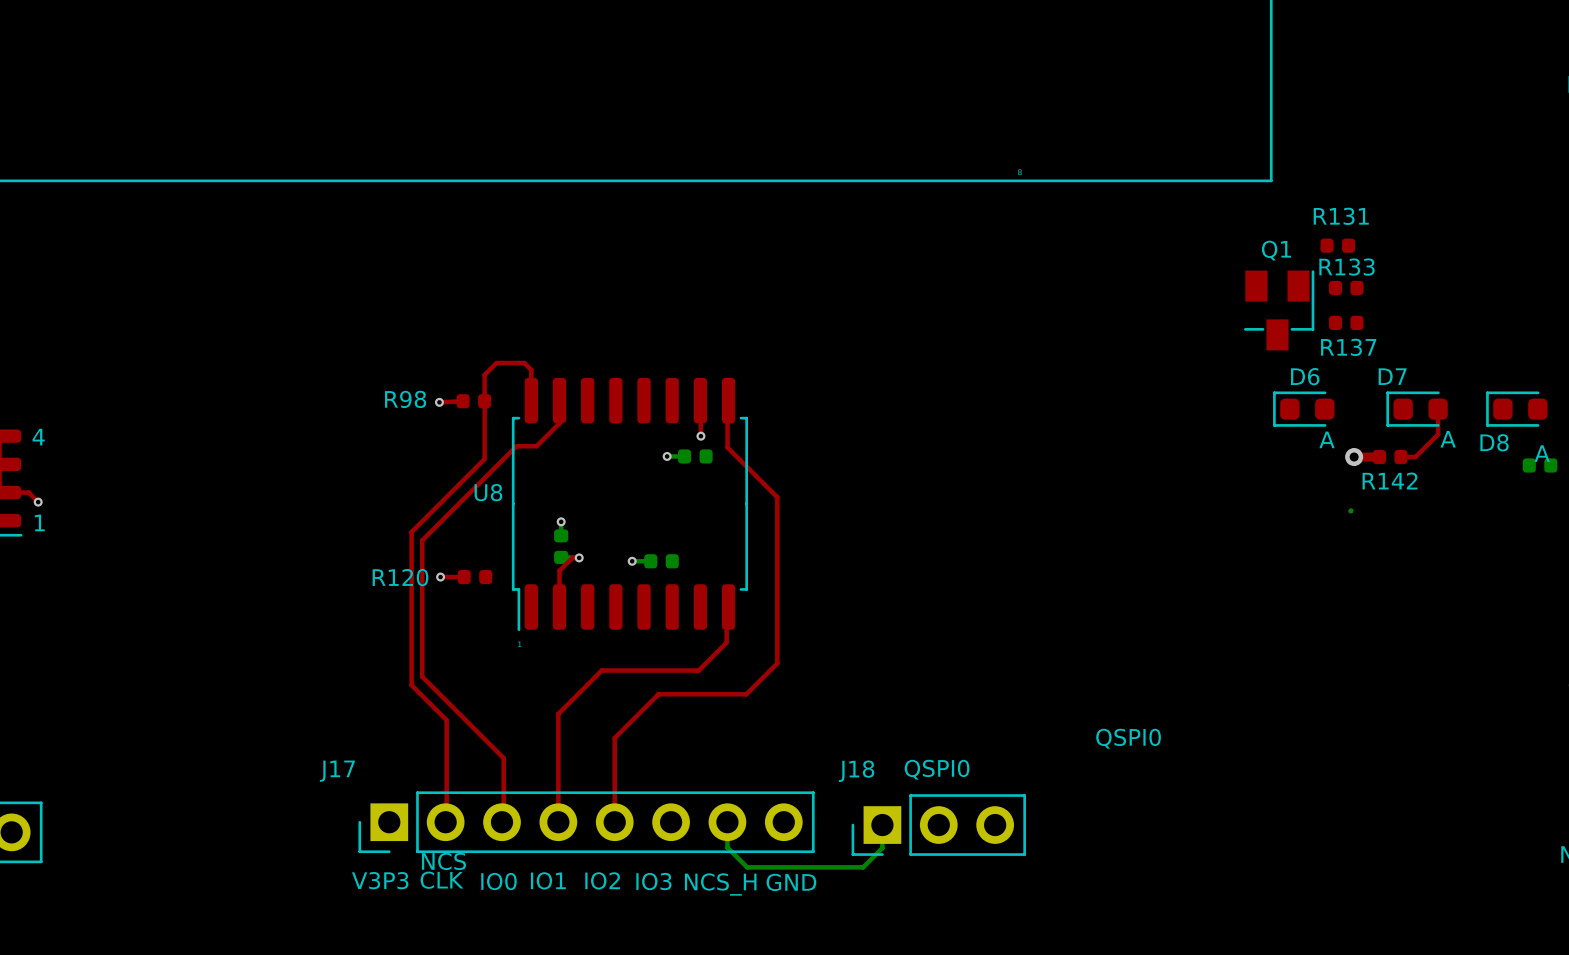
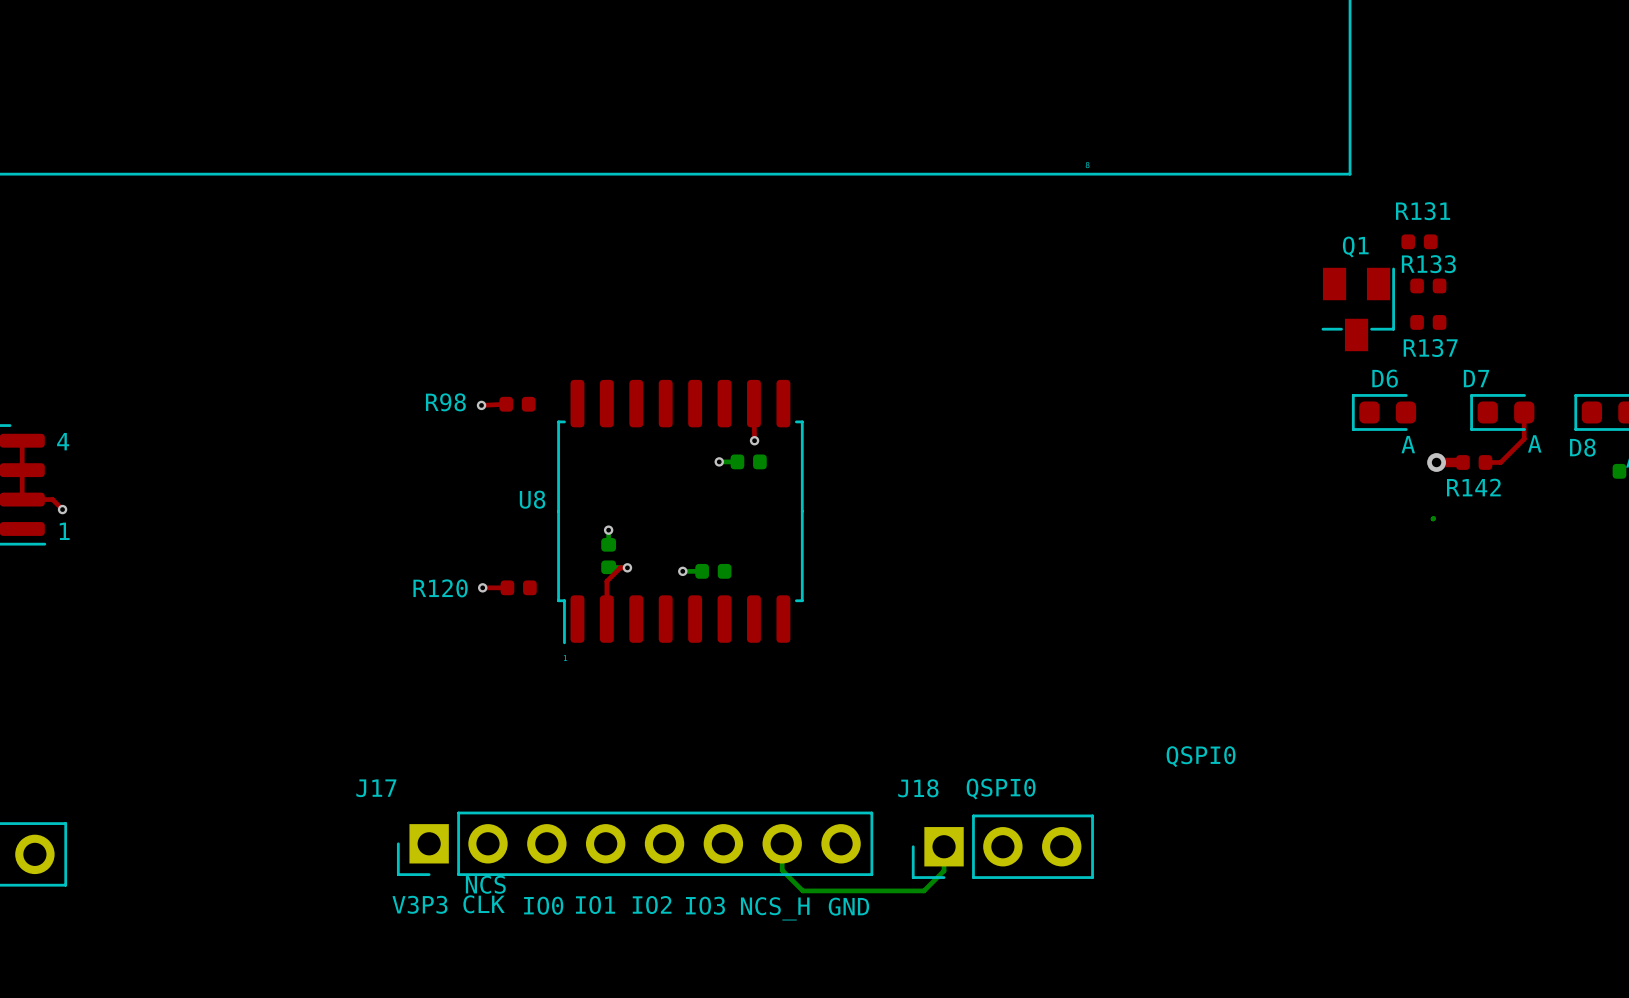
top track: (727, 387) (727, 447) (777, 497) (777, 663) (746, 694) (658, 694) (614, 738) (614, 822) -> none
top track: (531, 400) (531, 369) (524, 363) (496, 363) (484, 374) (484, 459) (411, 532) (411, 685) (446, 720) (446, 828) -> none
top track: (559, 400) (559, 423) (536, 446) (516, 446) (422, 540) (422, 676) (503, 758) (503, 830) -> none
top track: (726, 597) (726, 642) (698, 670) (601, 670) (558, 713) (558, 822) -> none

